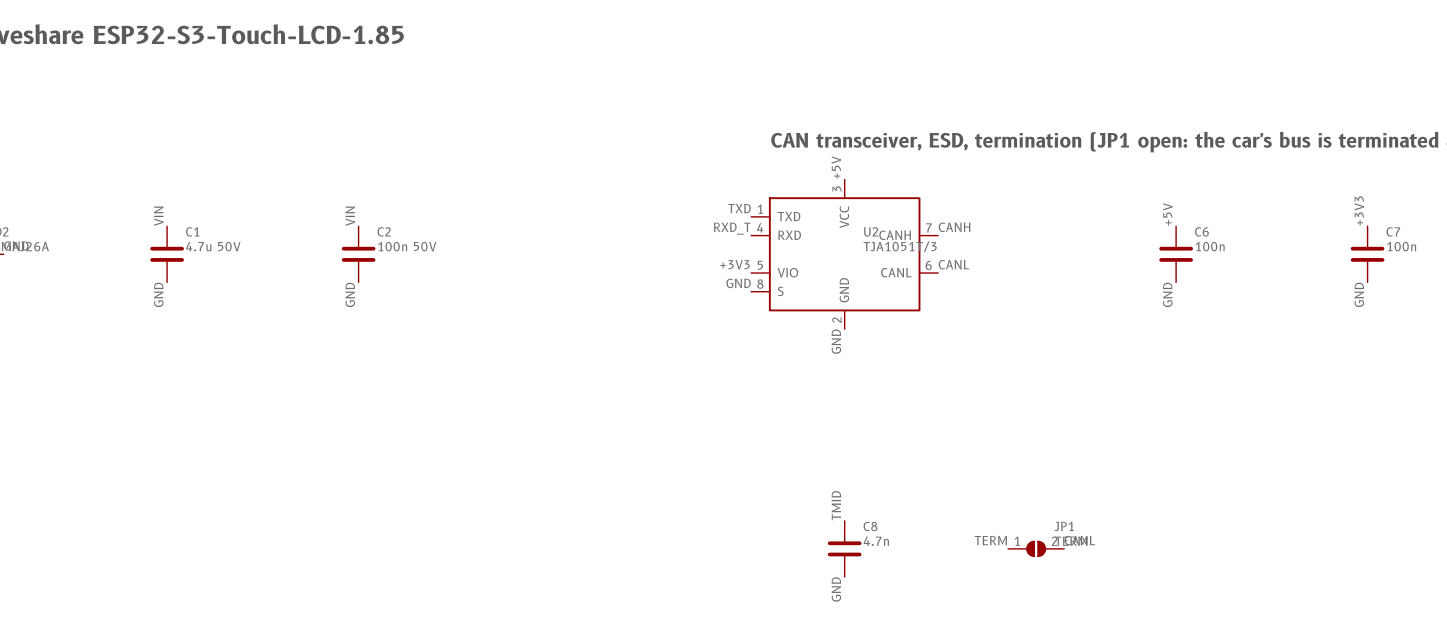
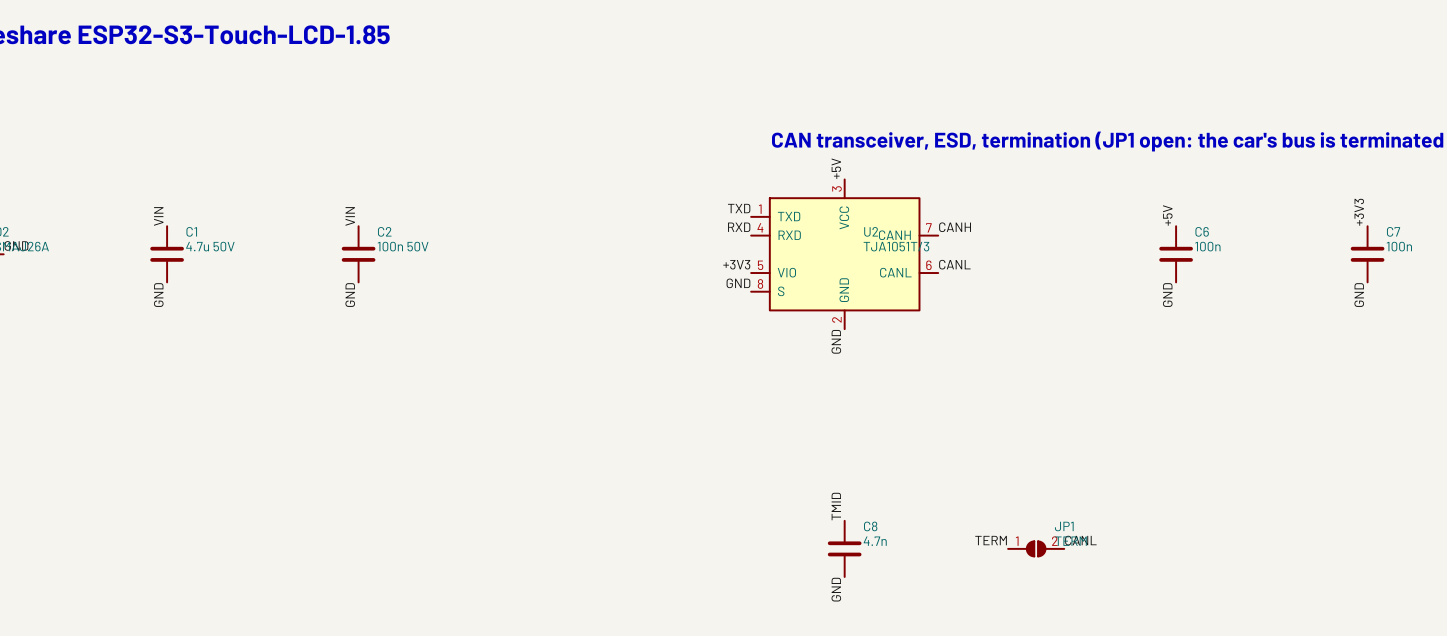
label: RXD_T (732, 228) -> RXD (739, 227)

